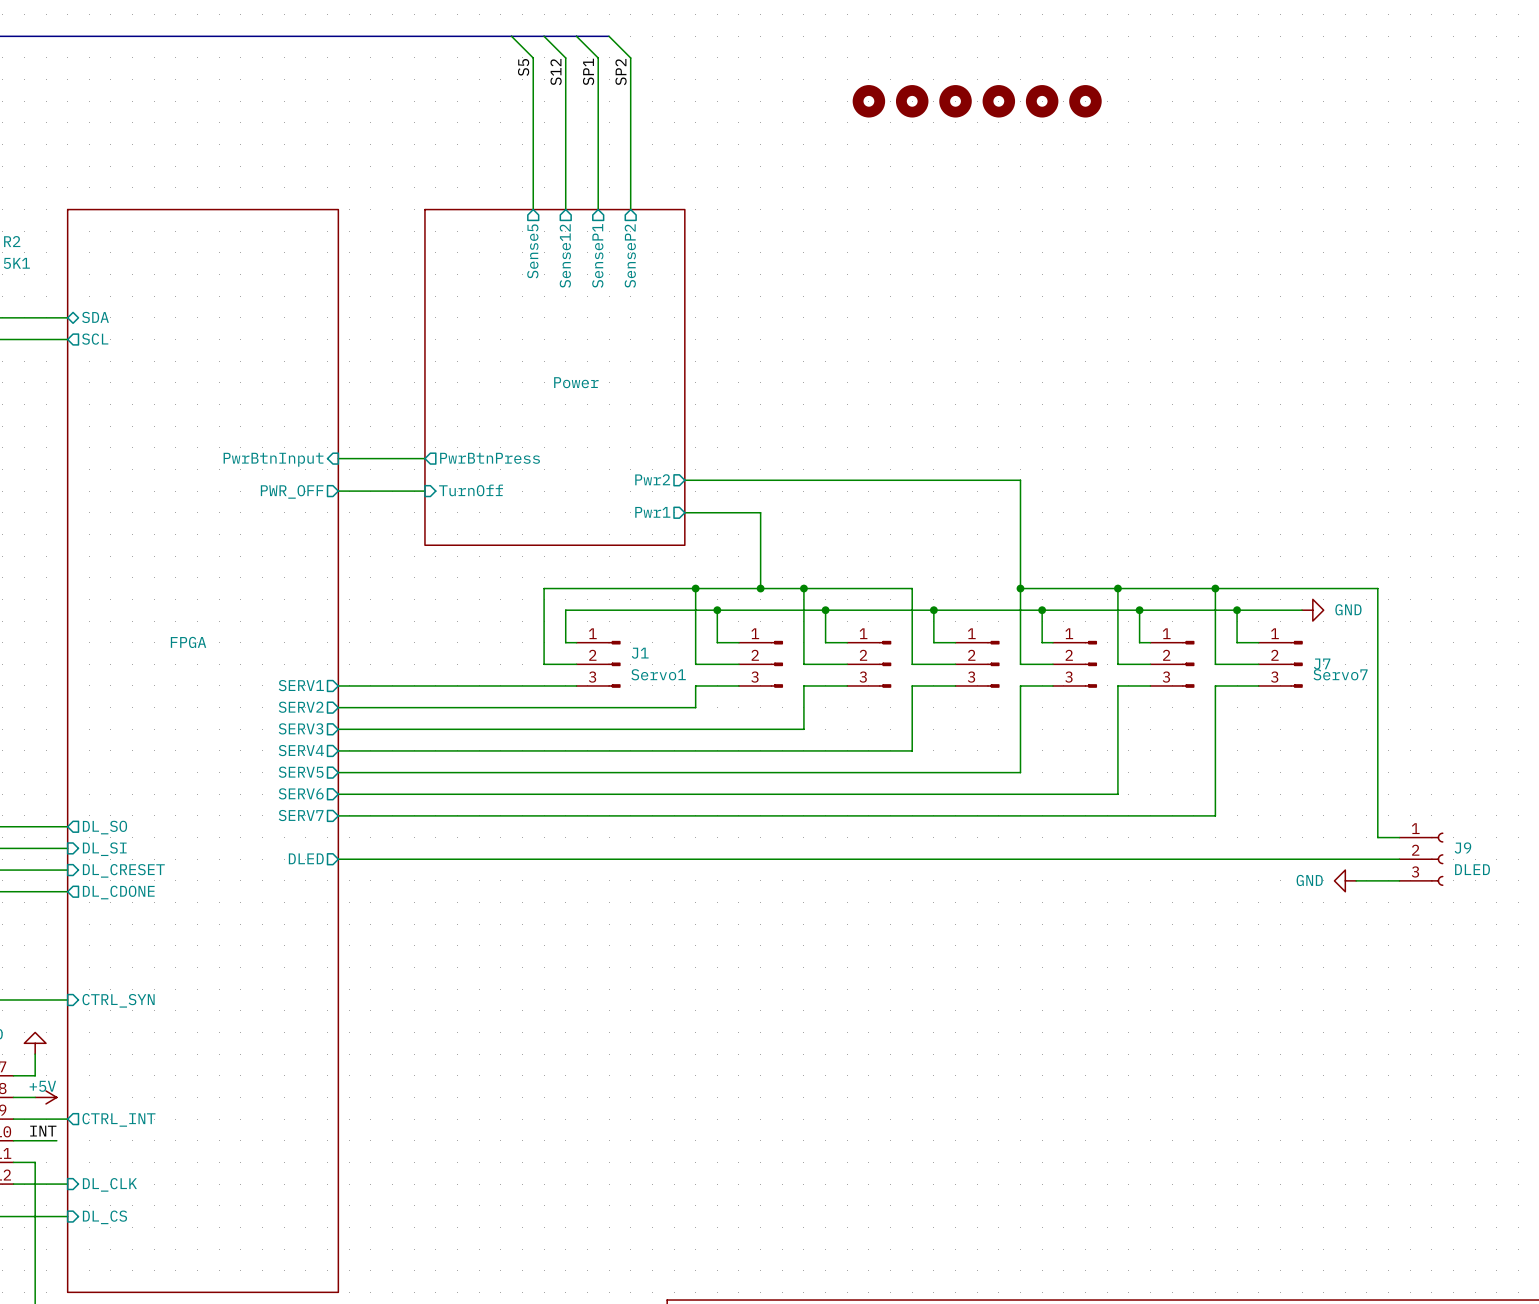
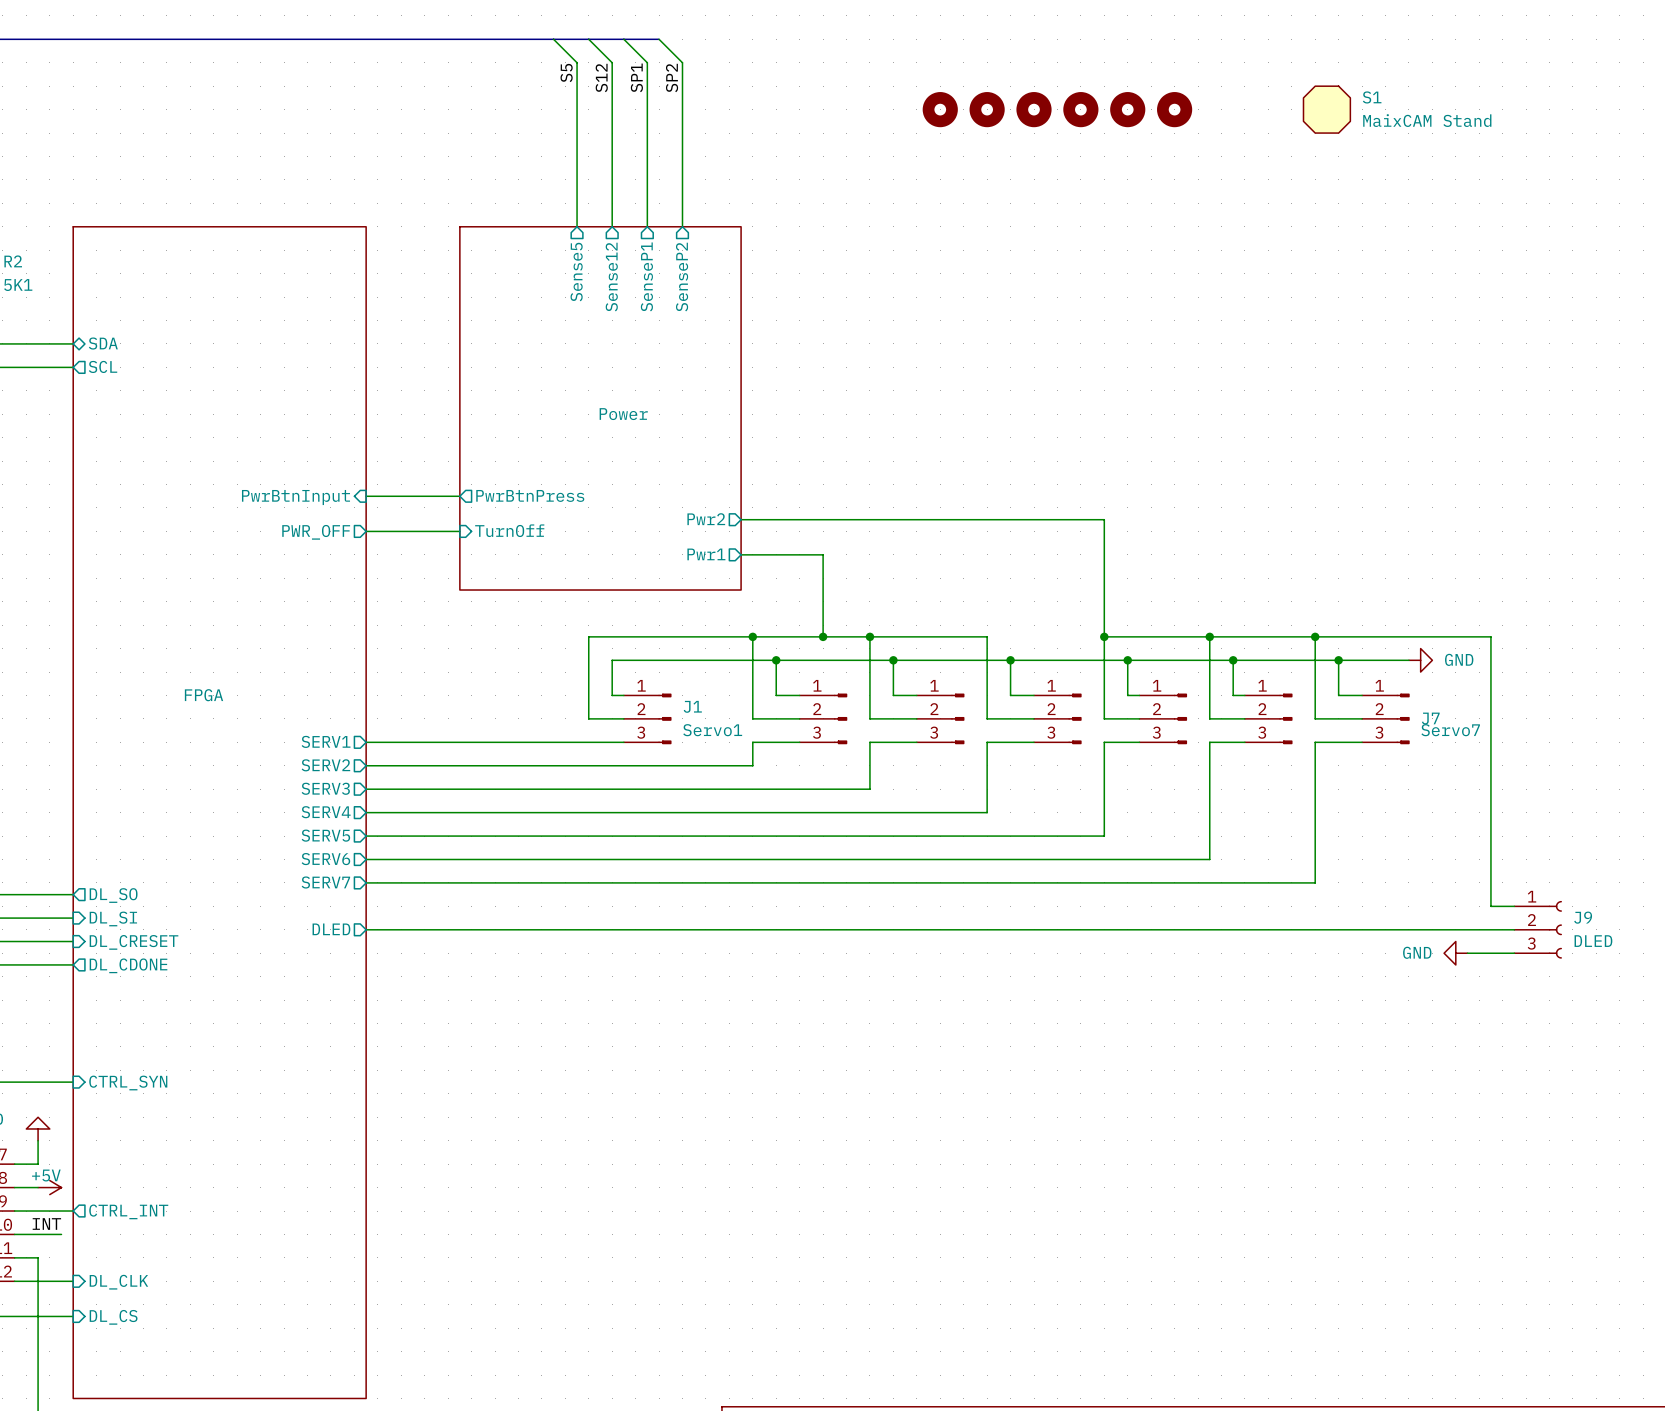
S1: none -> MaixCAM Stand (1326, 109)

